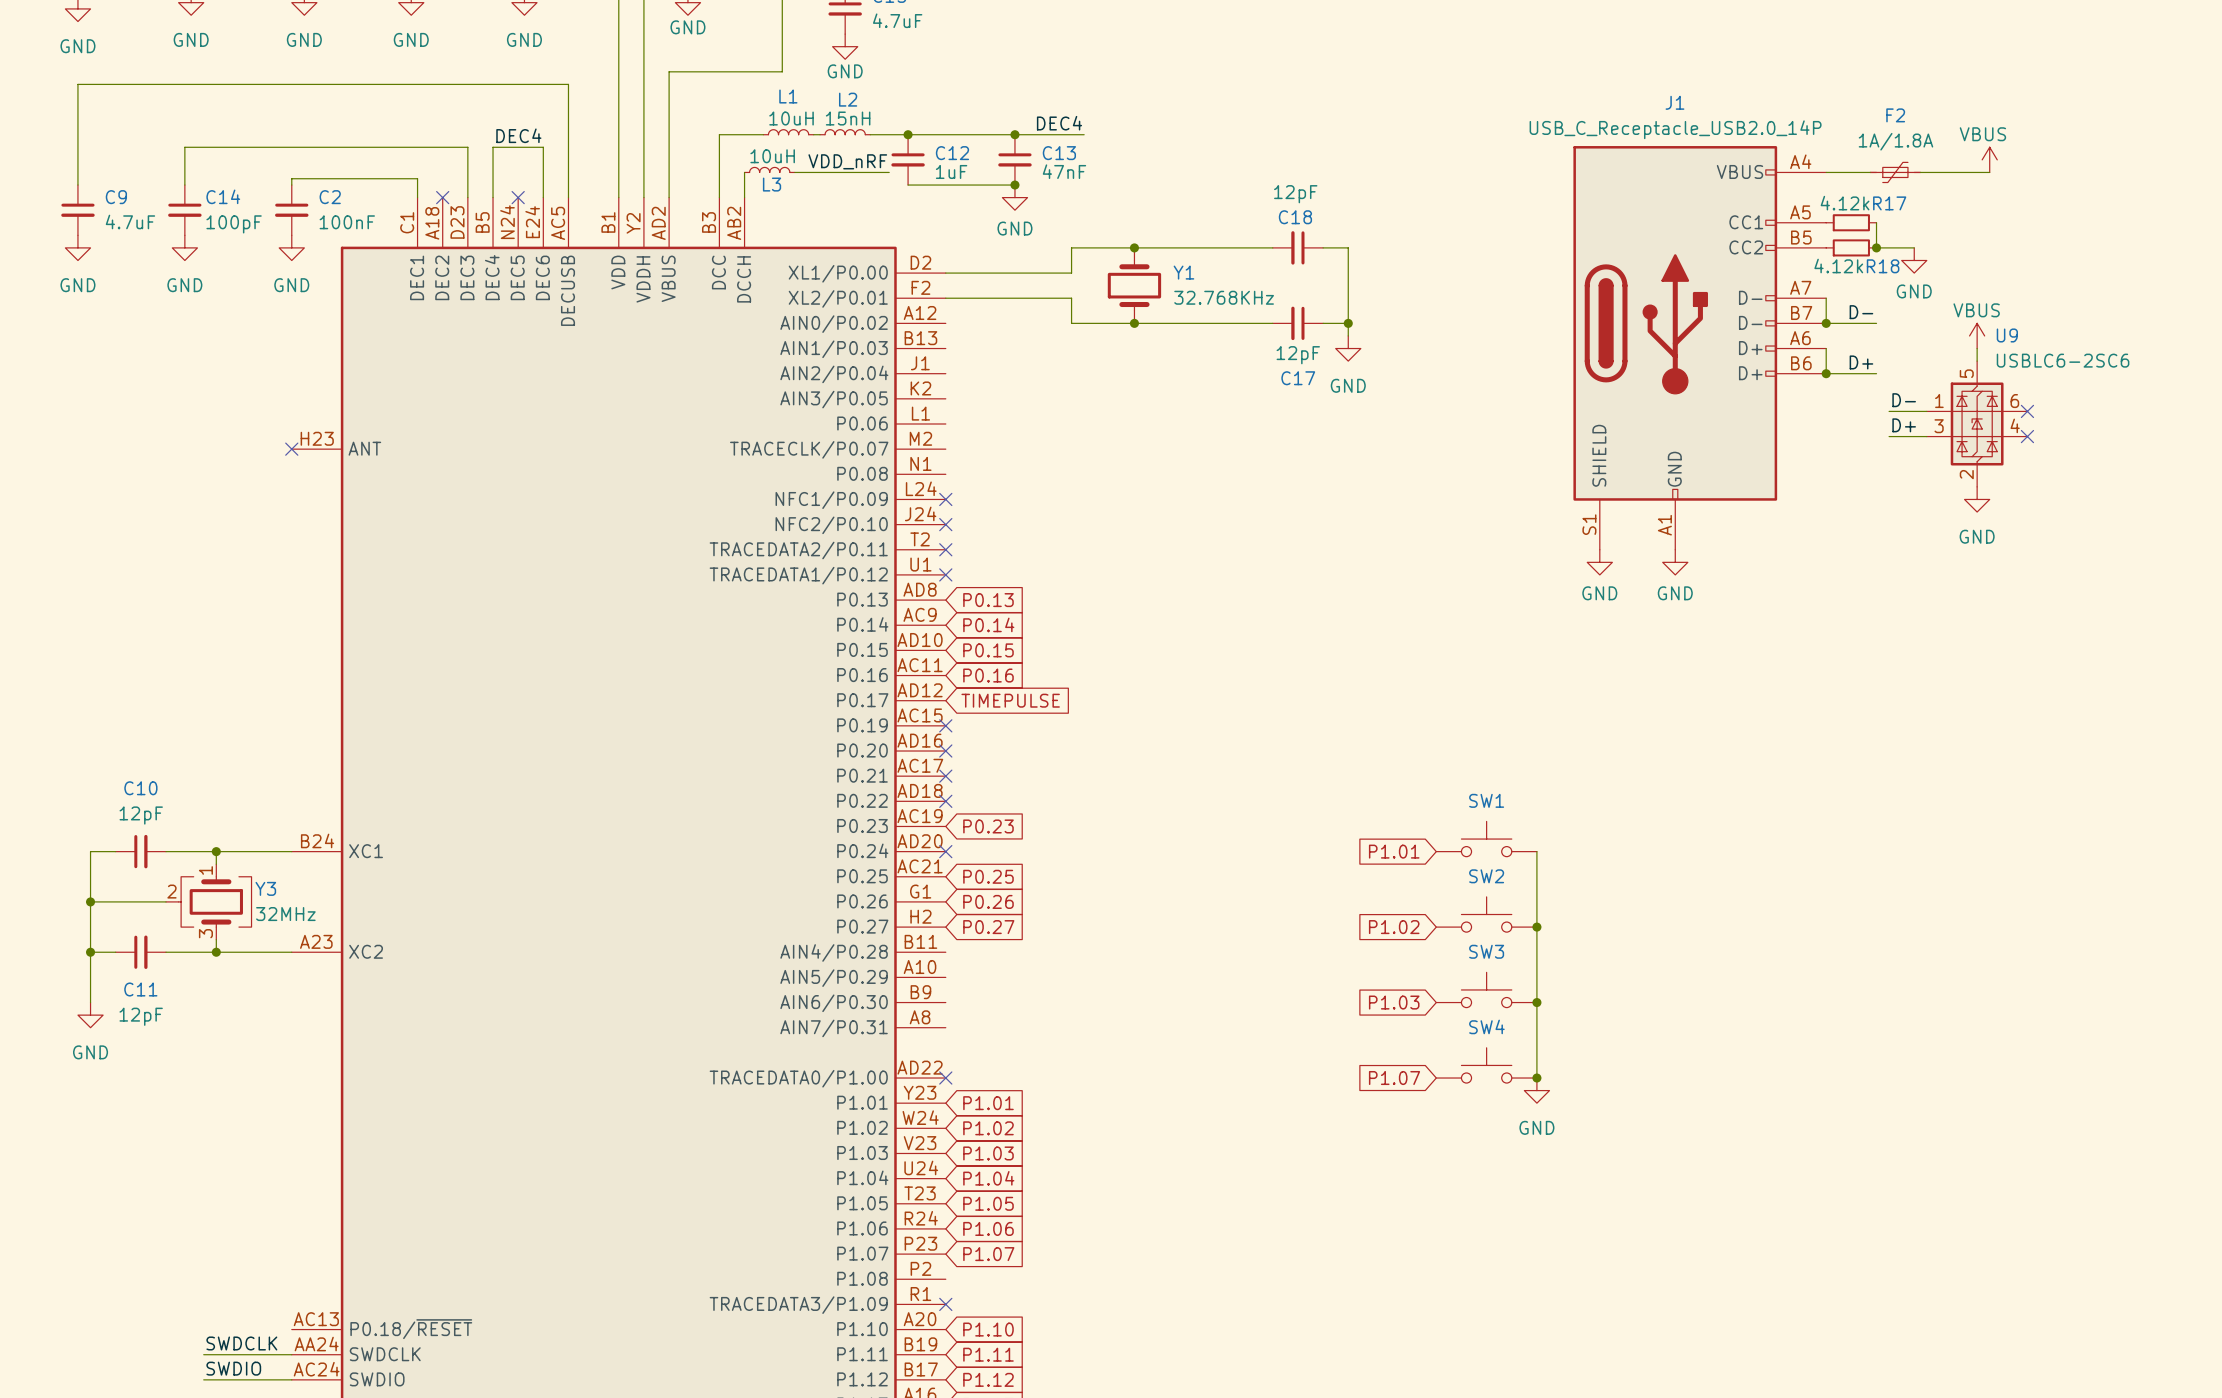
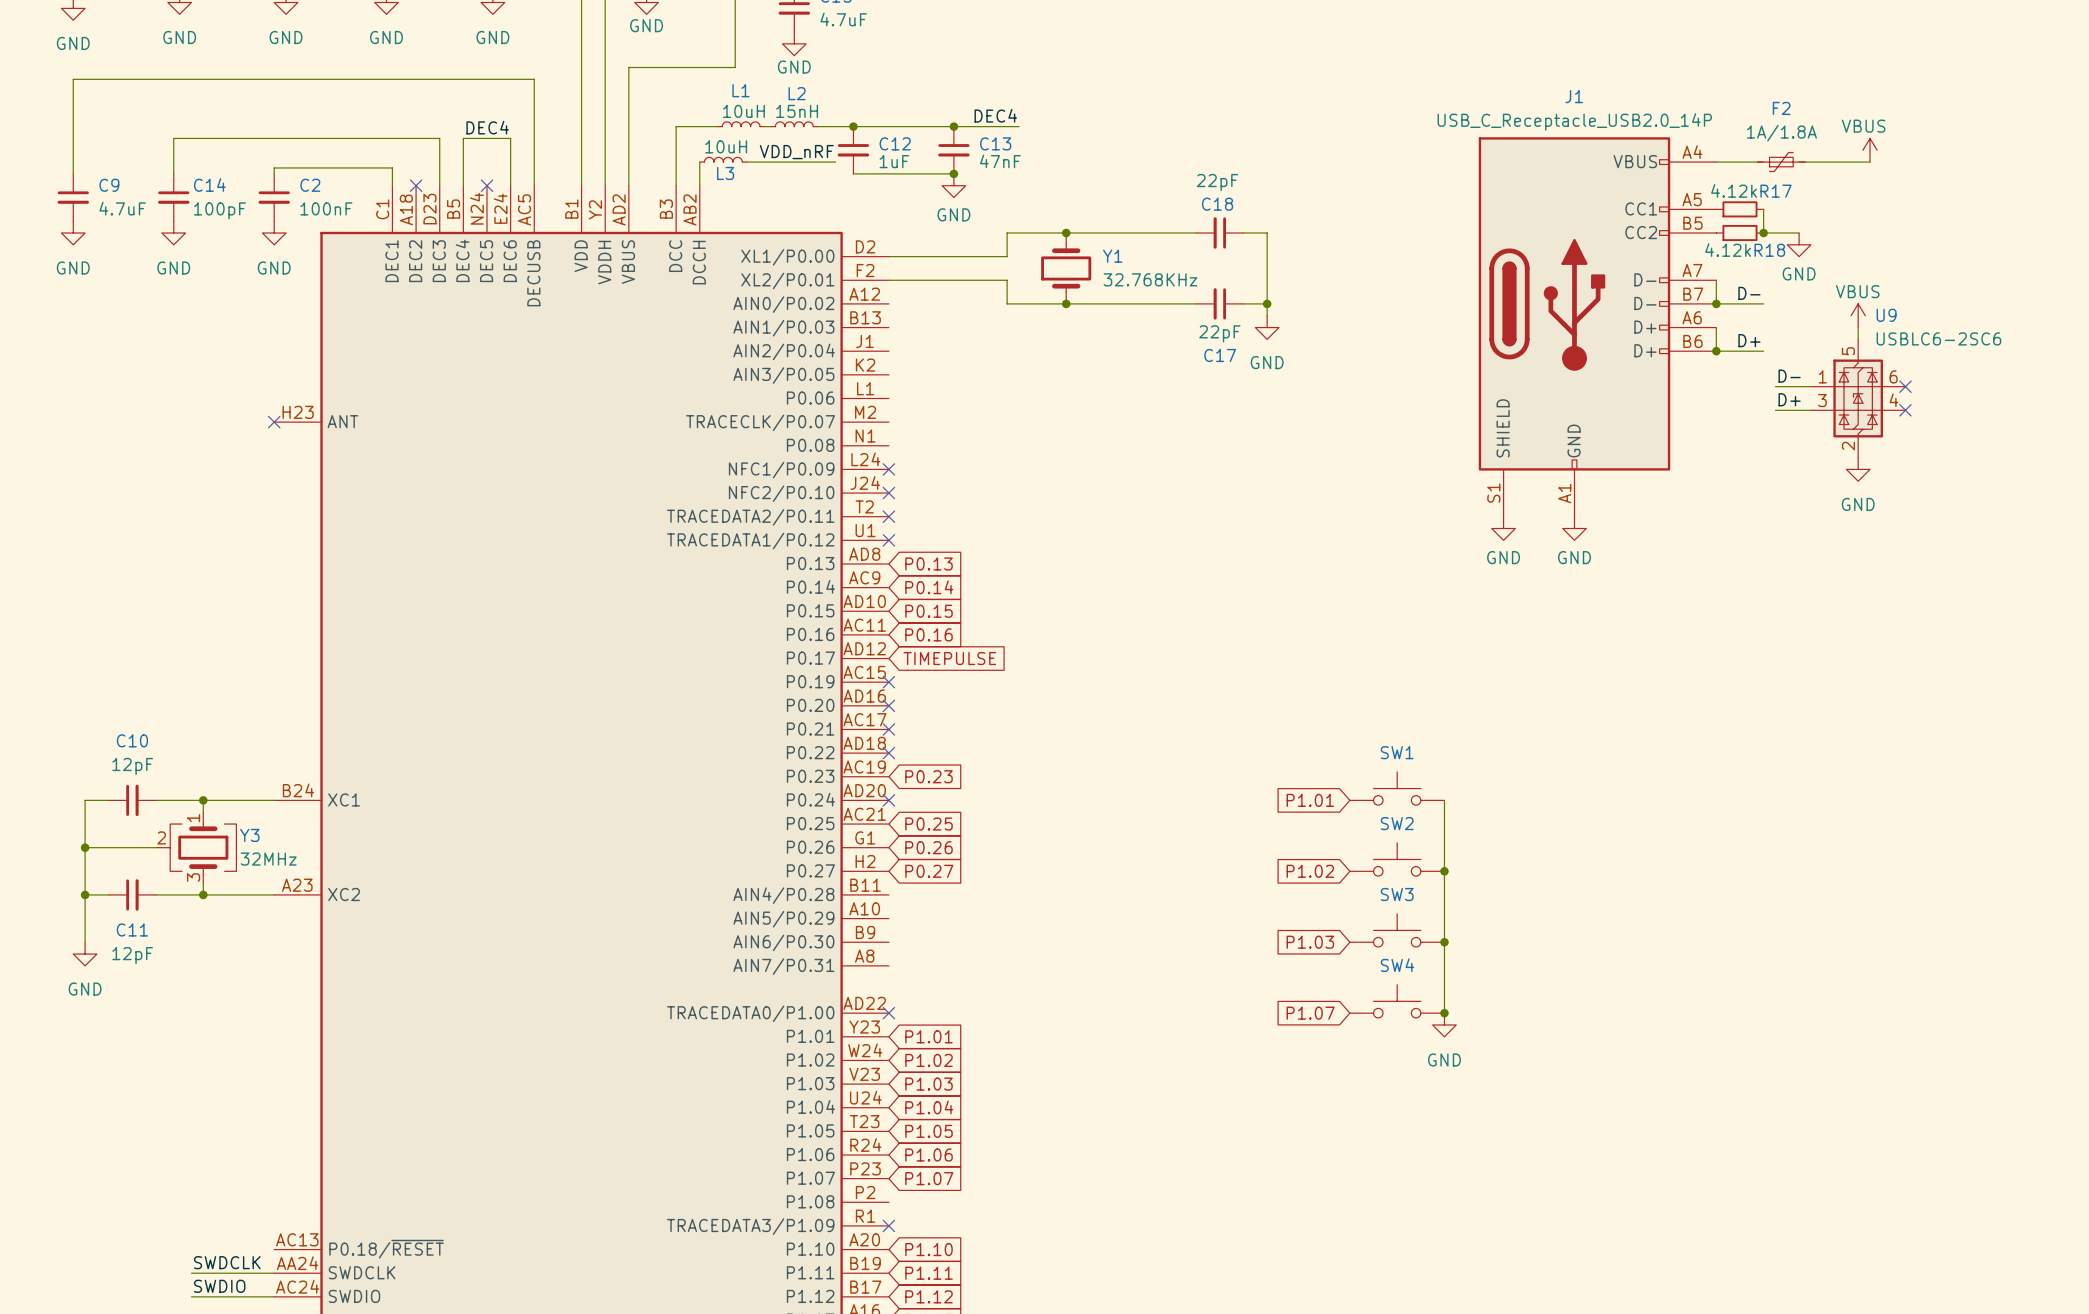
C18 value: 12pF (1295, 194) -> 22pF (1217, 182)
C17 value: 12pF (1298, 355) -> 22pF (1219, 333)

